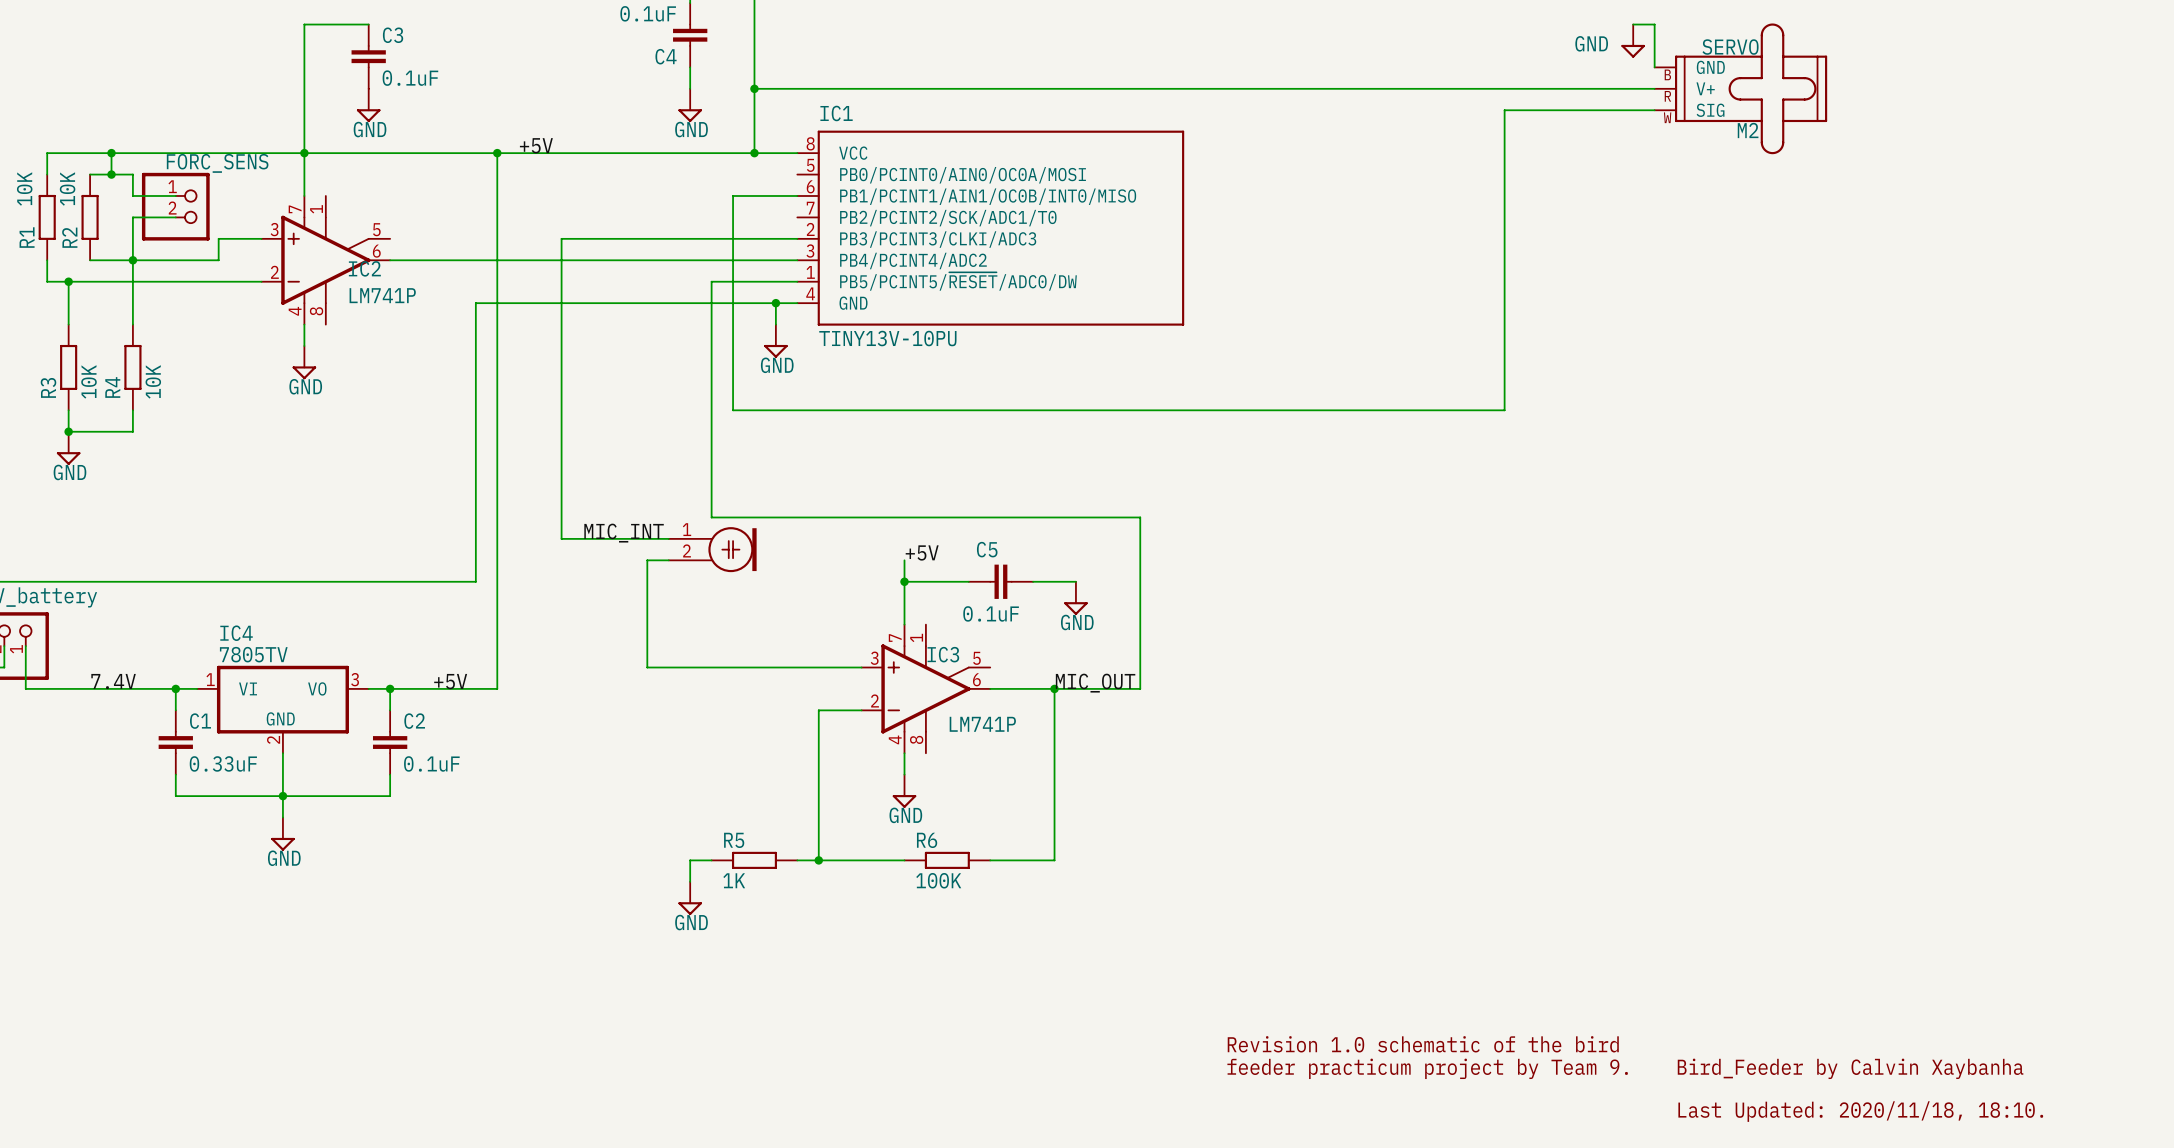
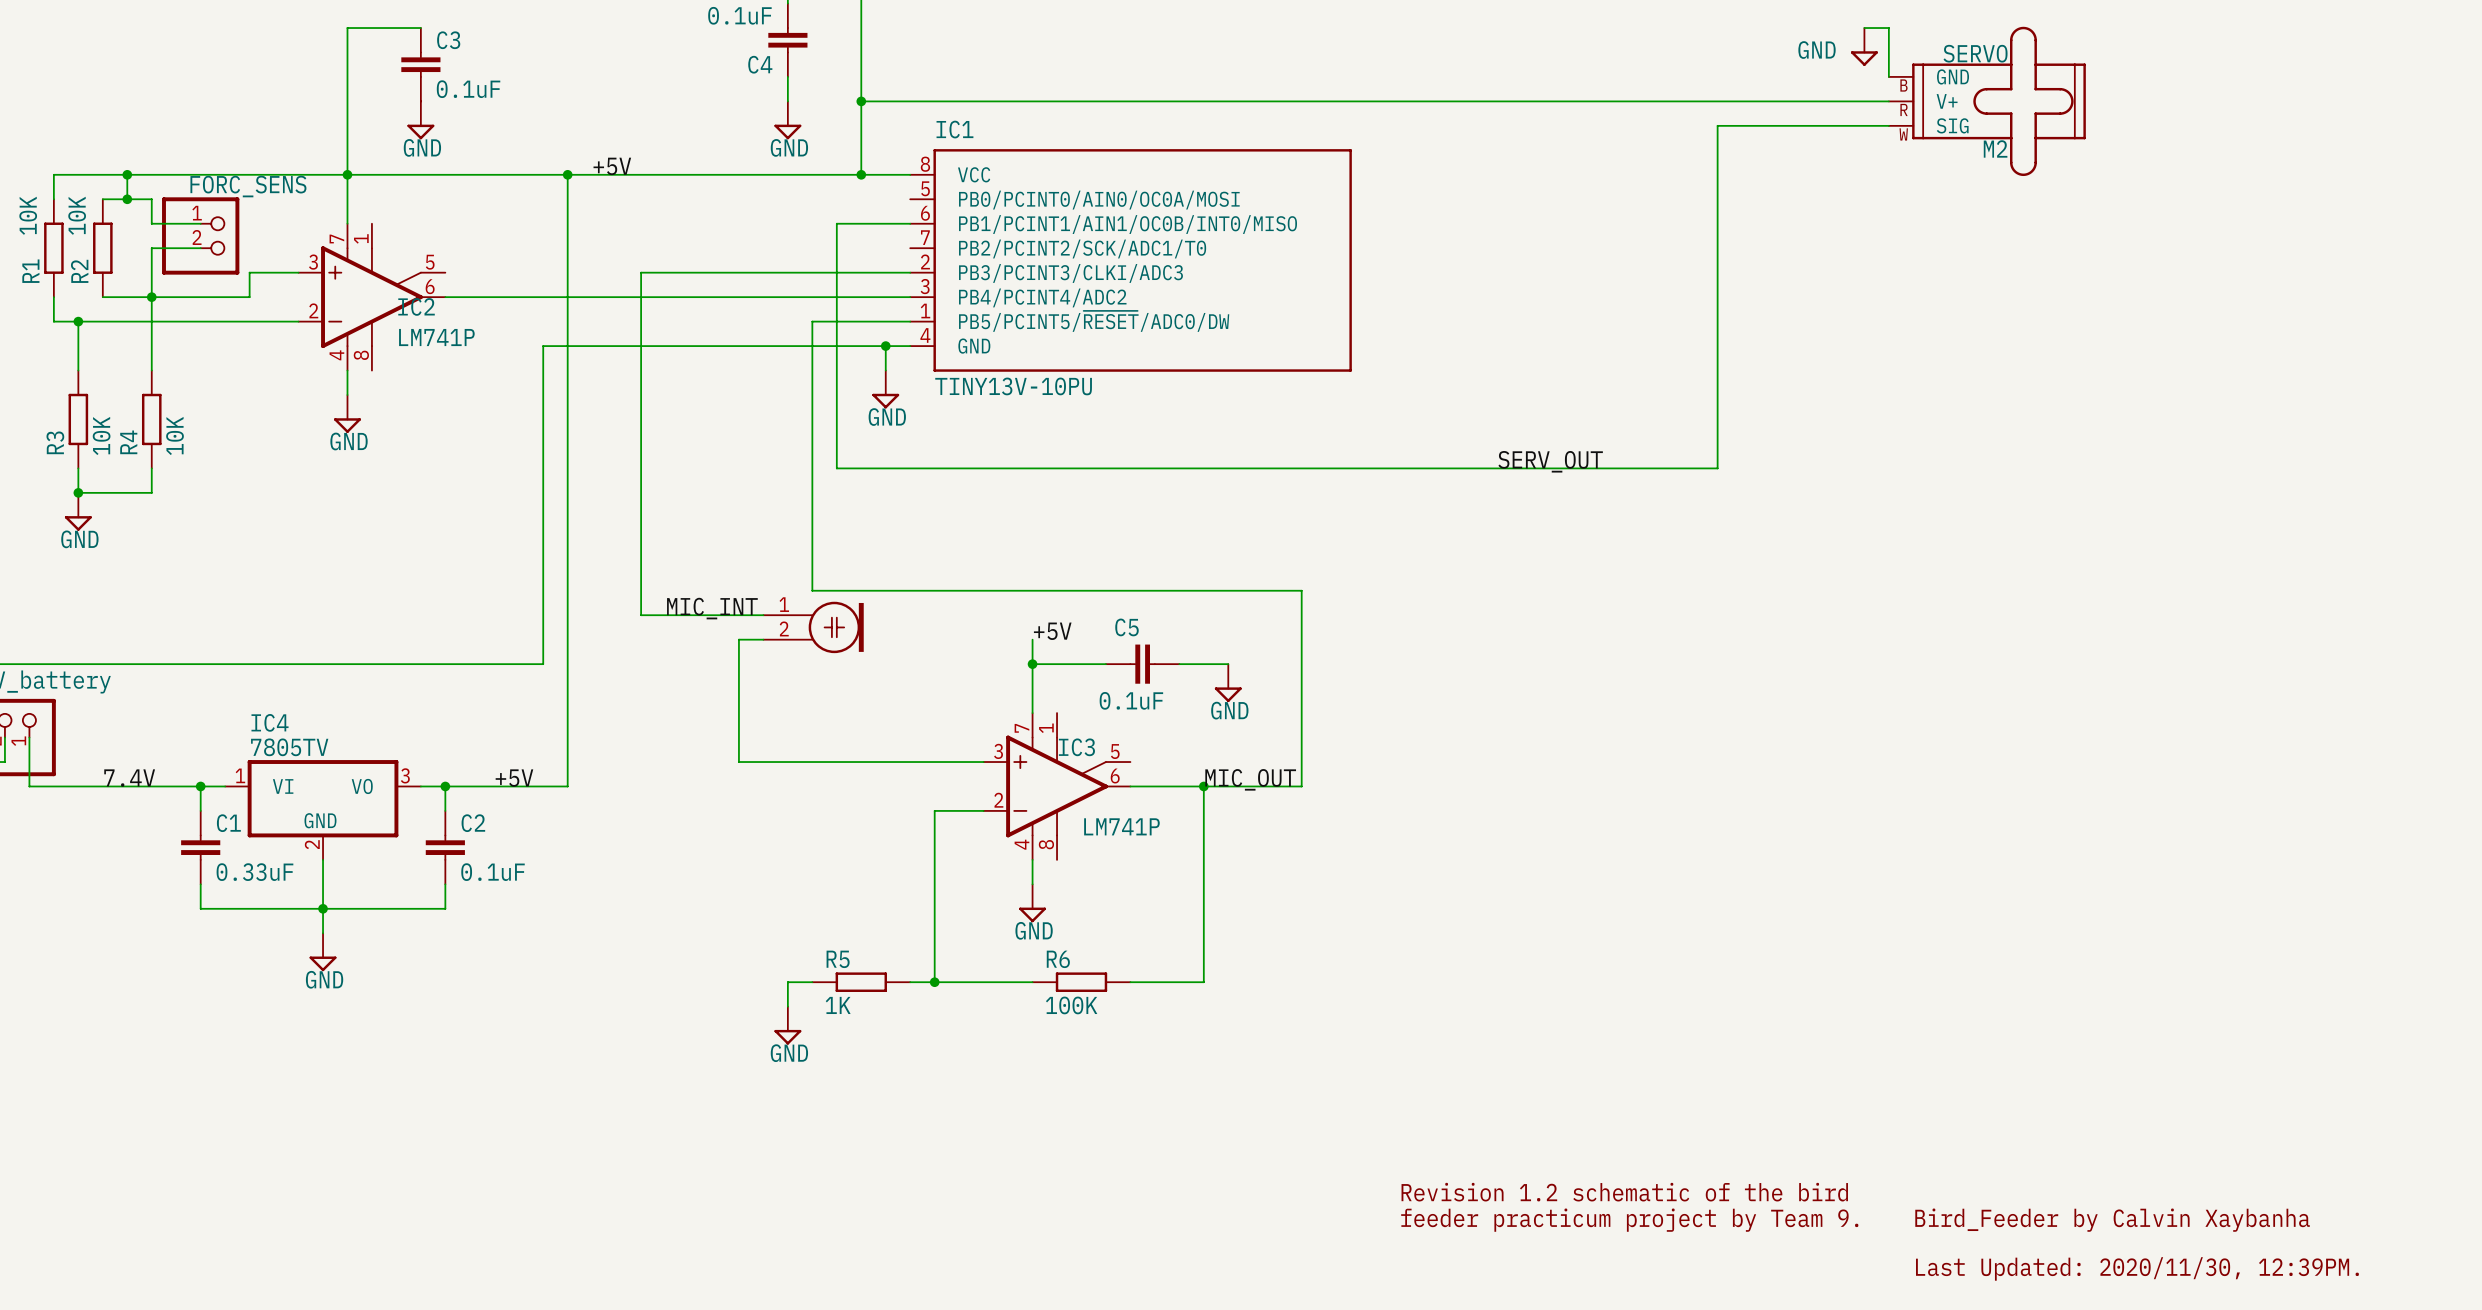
label: none -> SERV_OUT (1550, 461)
text: Revision 1.0 schematic of the bird (1423, 1044) -> Revision 1.2 schematic of the bird (1624, 1192)
text: Last Updated: 2020/11/18, 18:10. (1860, 1111) -> Last Updated: 2020/11/30, 12:39PM. (2137, 1268)

